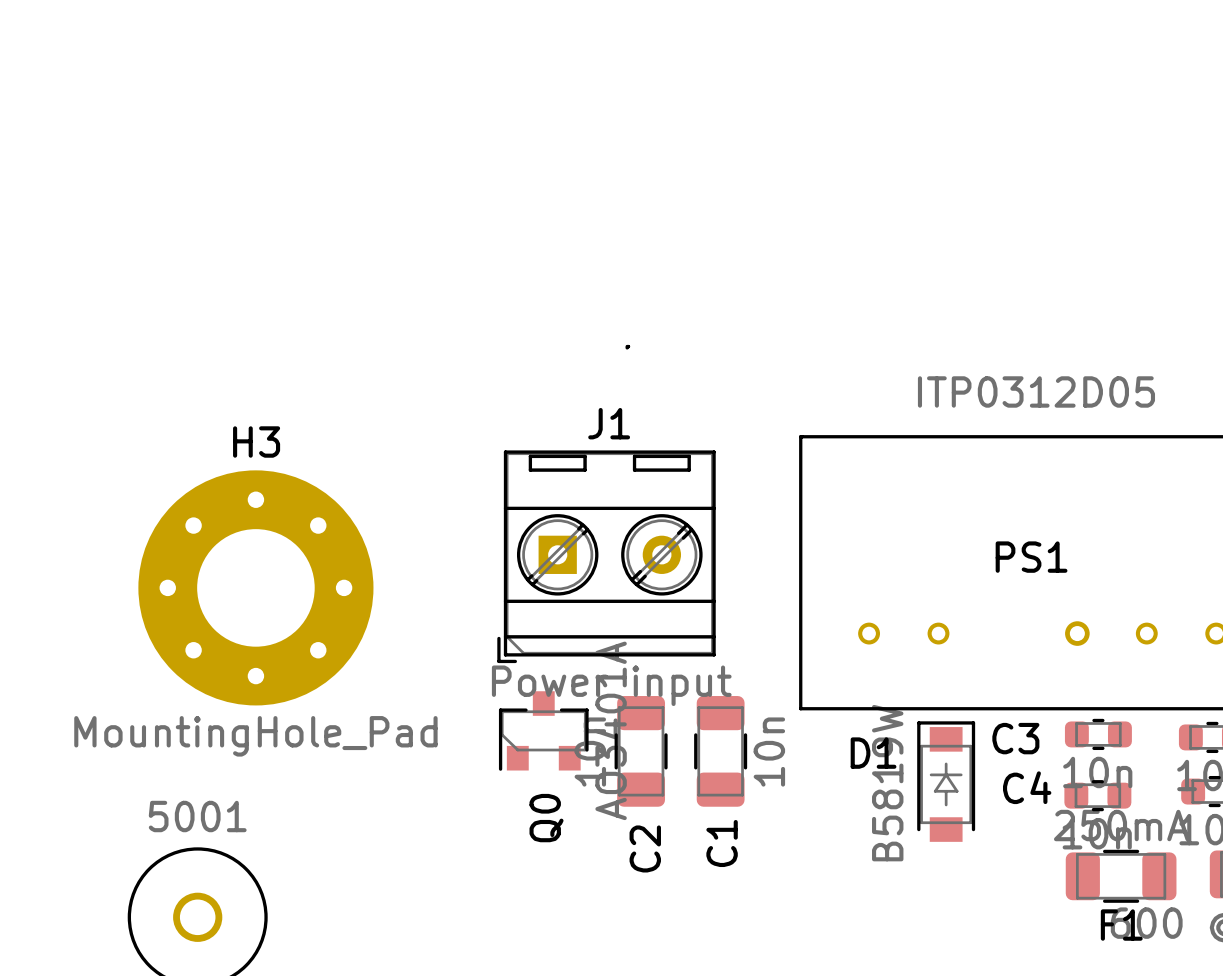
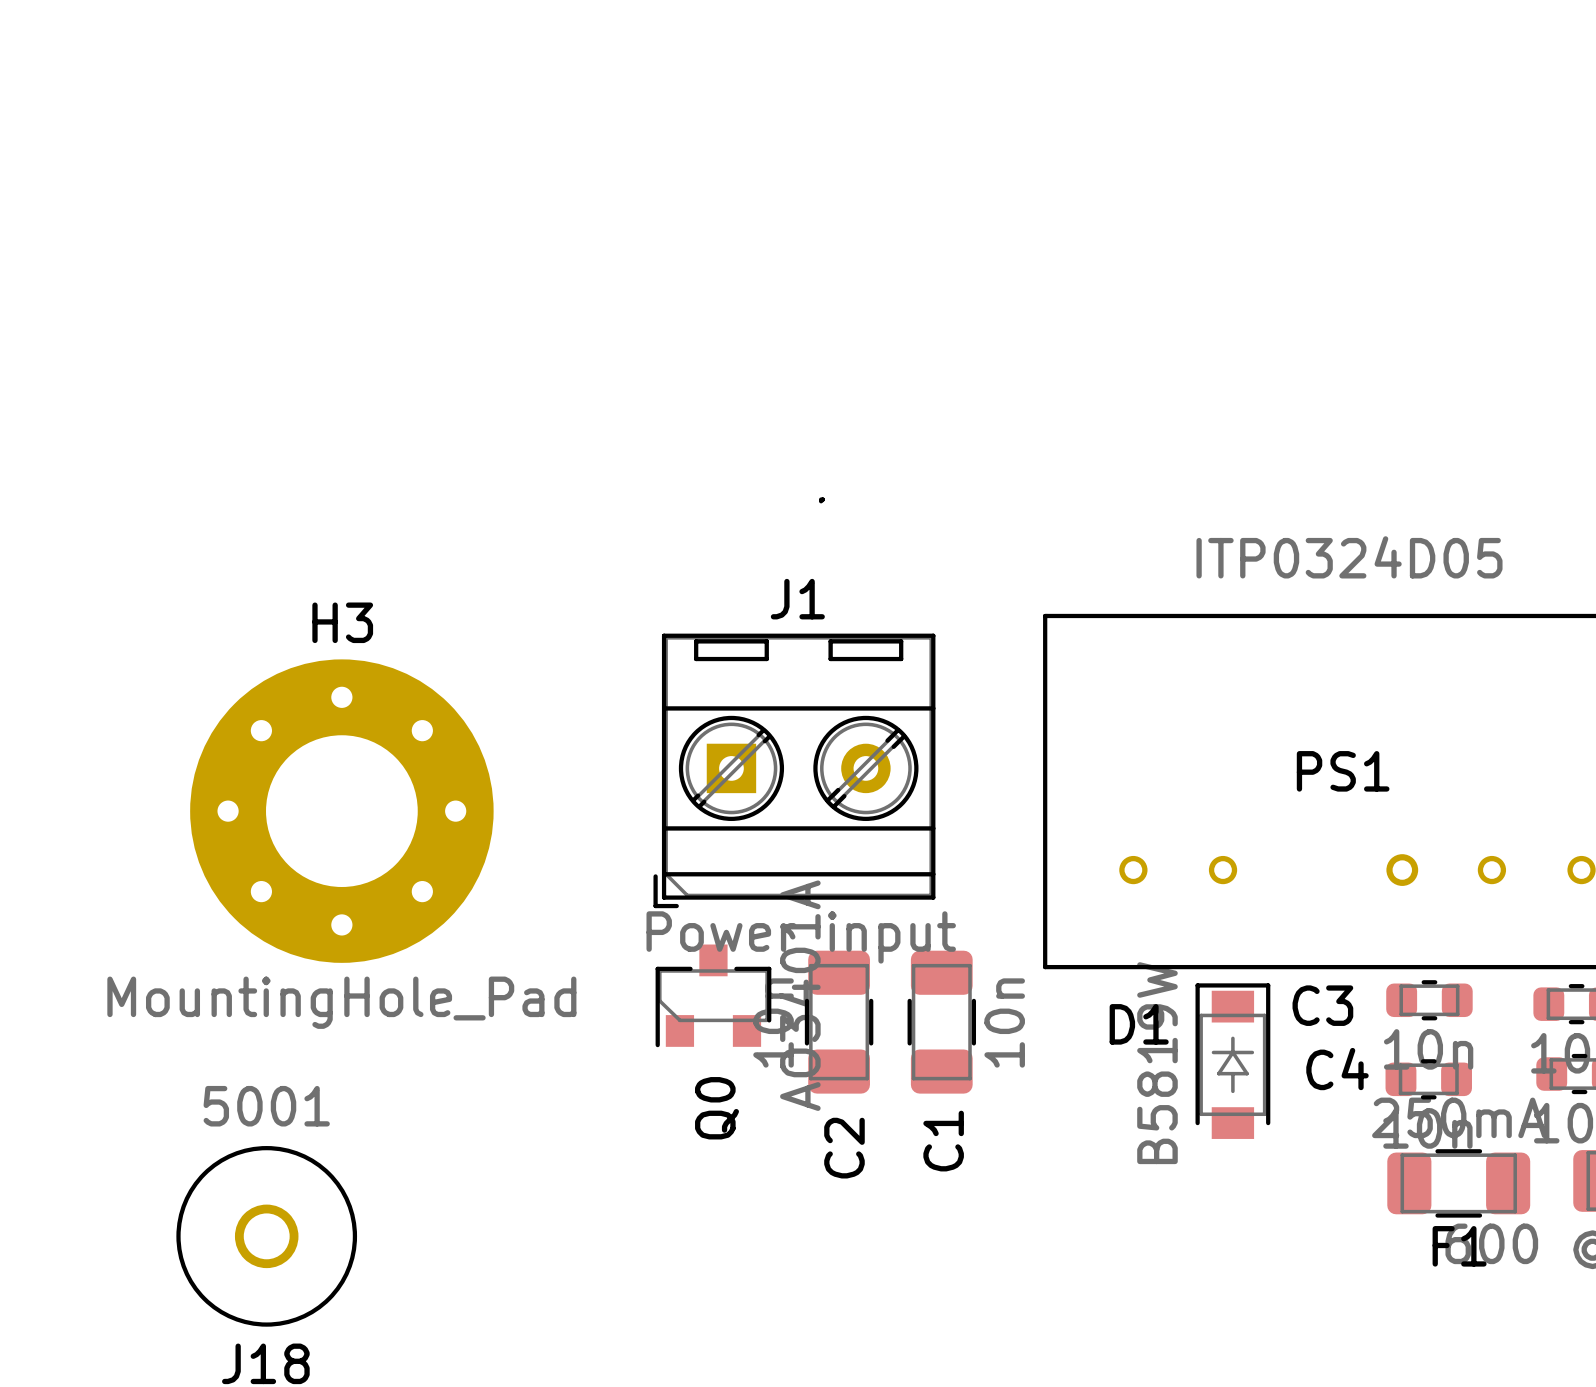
PS1 value: ITP0312D05 (1036, 391) -> ITP0324D05 (1349, 557)

